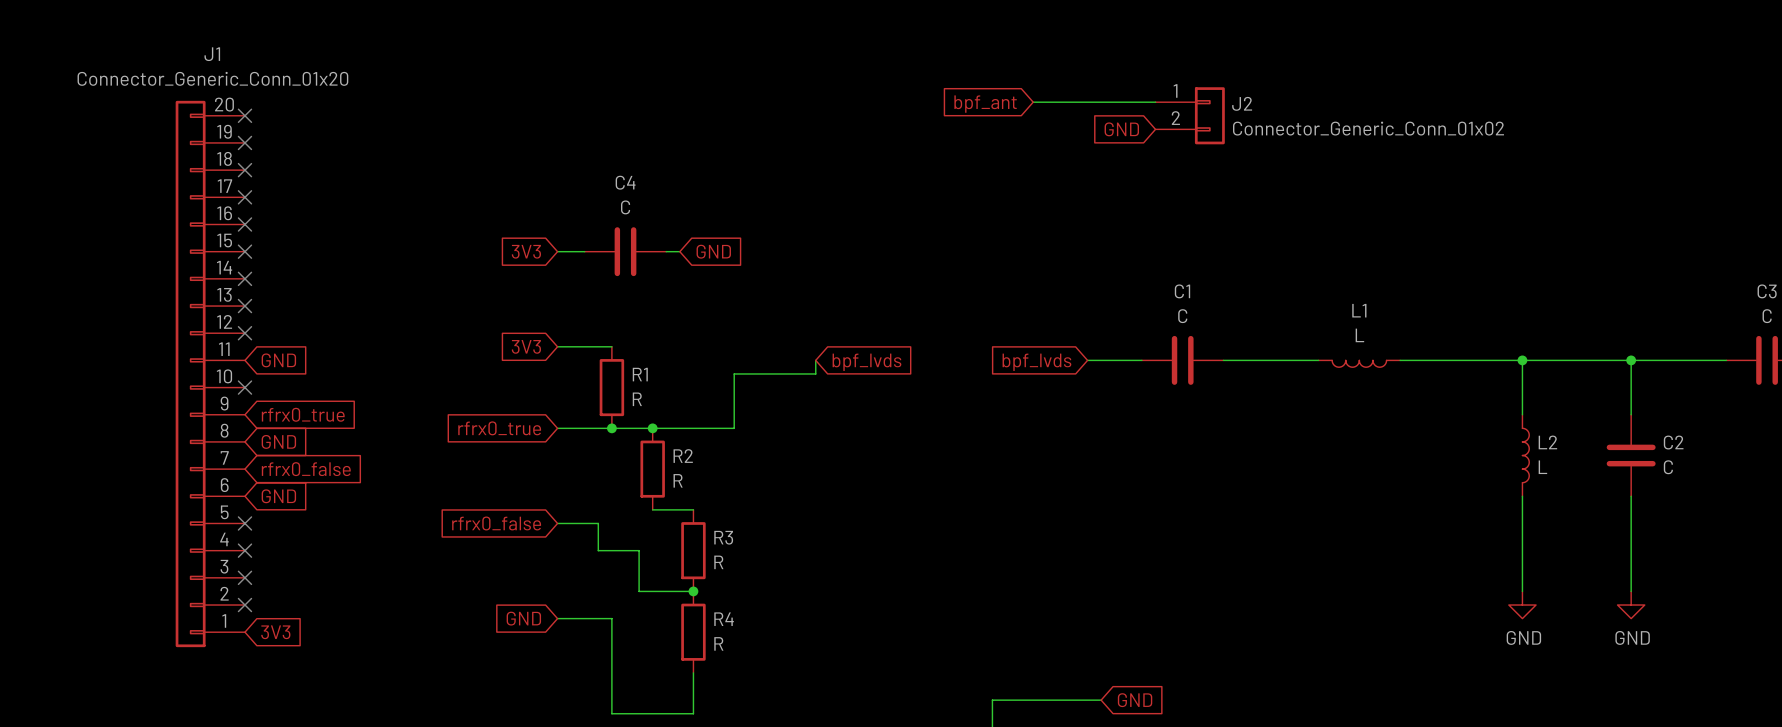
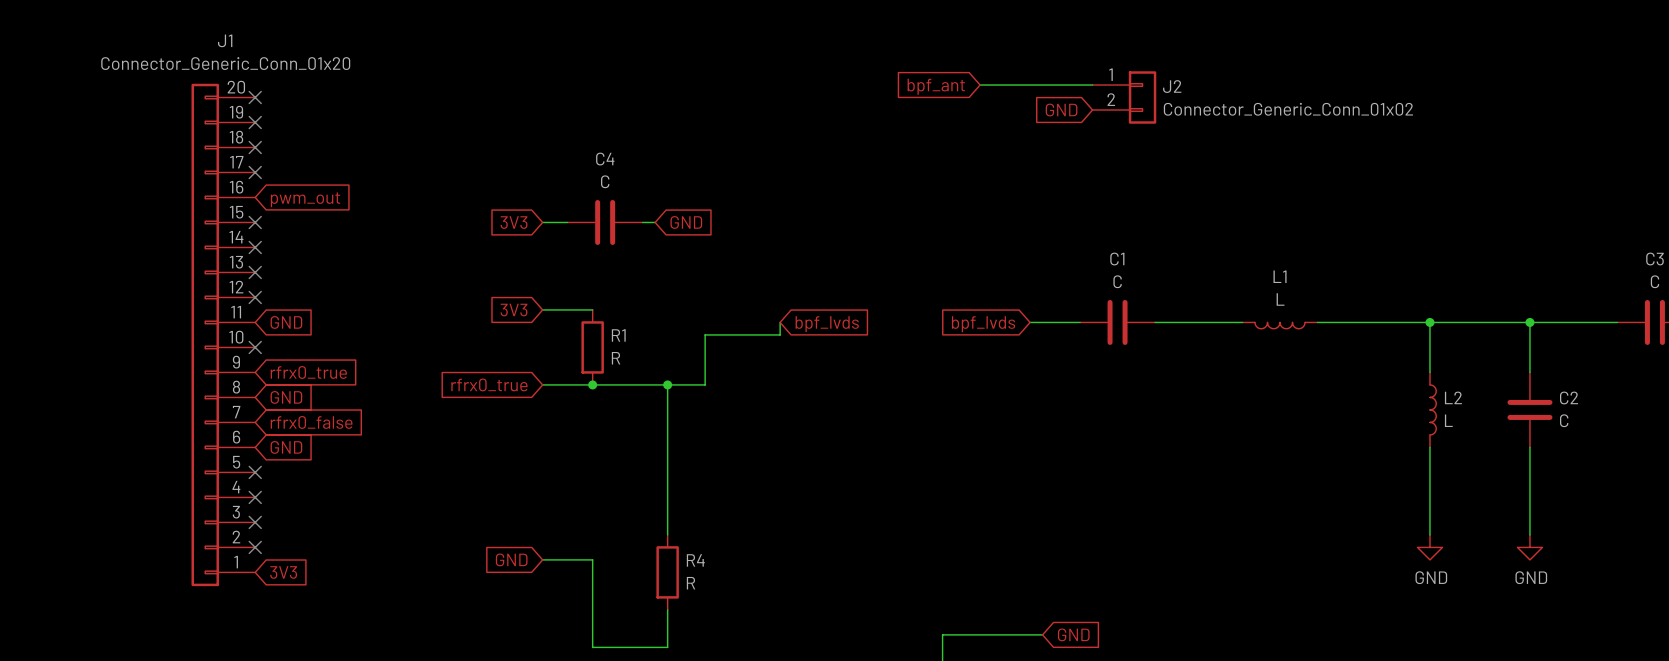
no-connect mark: (244, 224) -> none
global label: none -> pwm_out (305, 199)
junction position: (652, 428) -> (667, 384)
R2: R (652, 469) -> none
wire: (652, 509) (693, 509) -> none
global label: rfrx0_false (496, 523) -> none
wire: (557, 523) (598, 523) (598, 550) (639, 550) (639, 591) (693, 591) -> (667, 384) (667, 534)
R3: R (693, 550) -> none
junction: (693, 591) -> none

